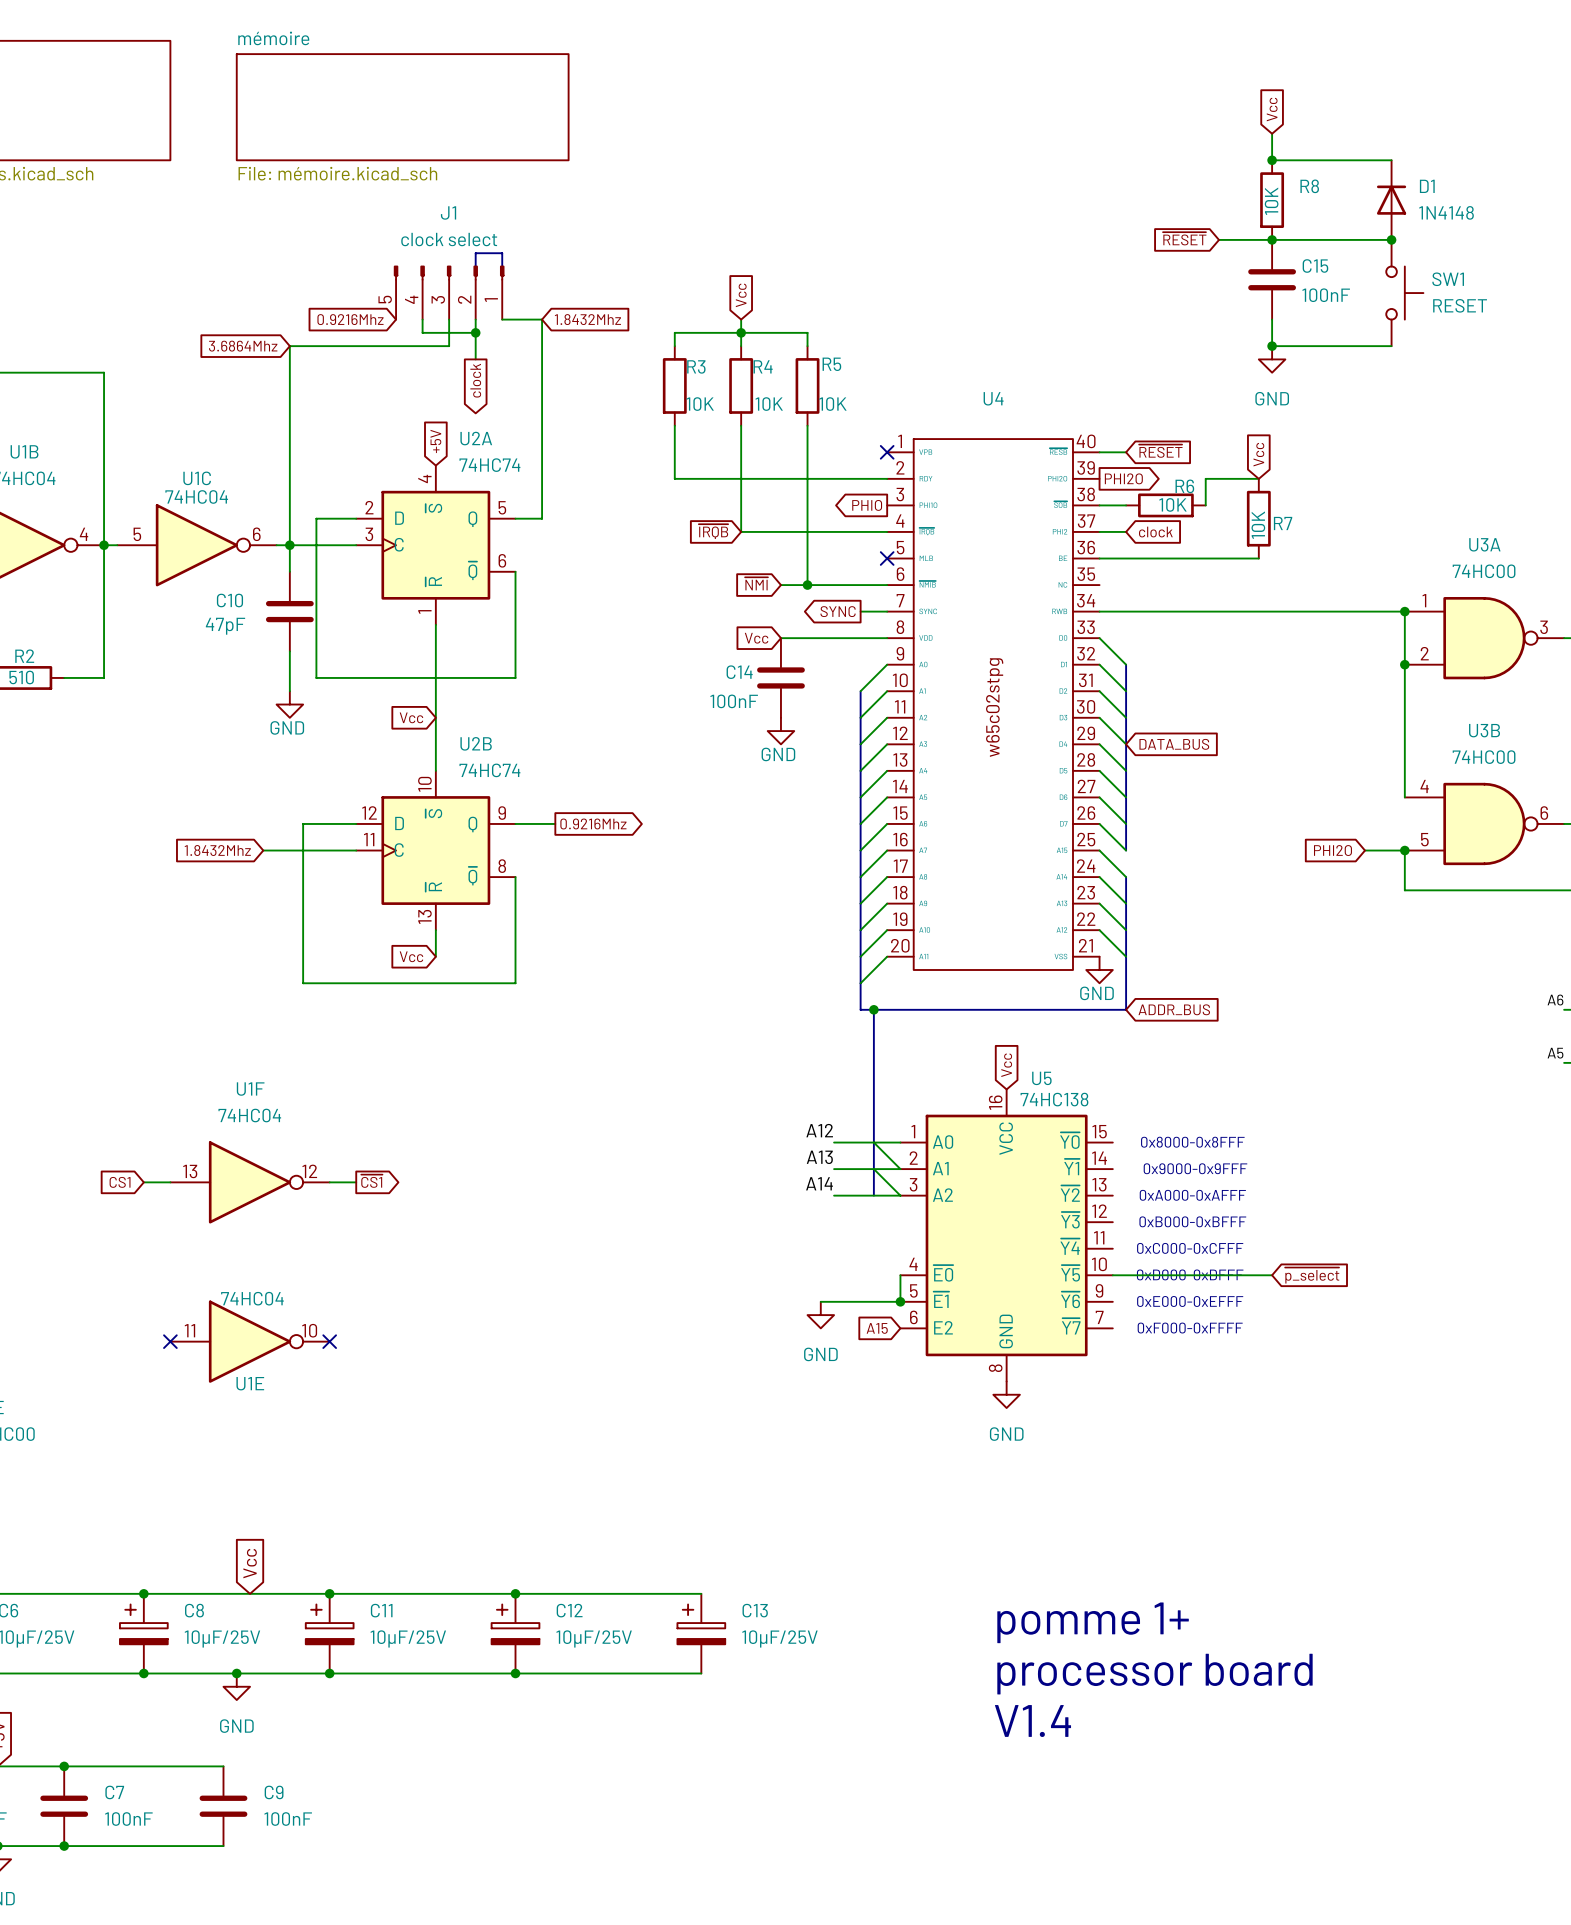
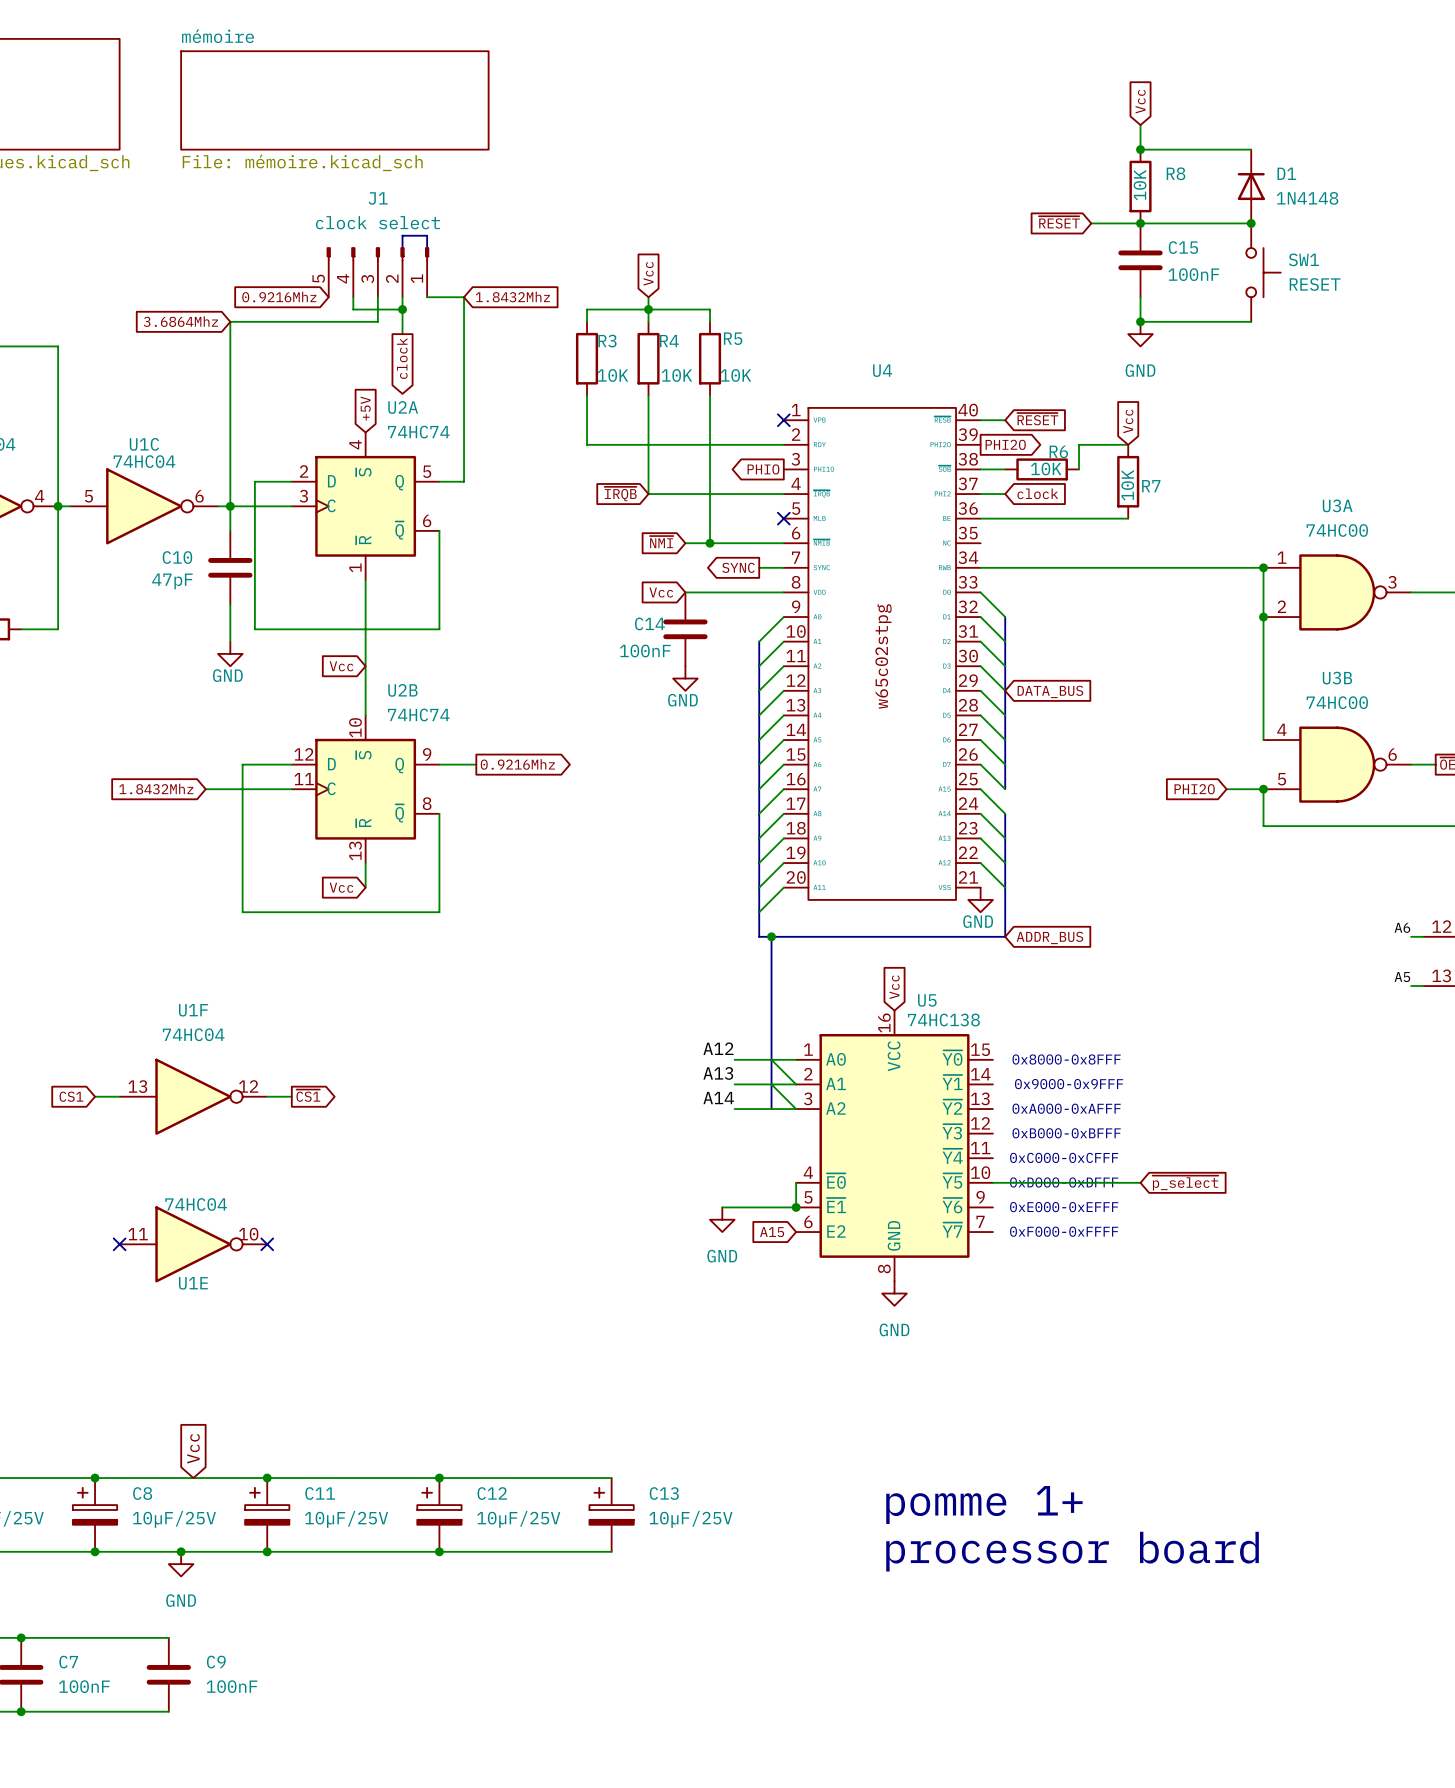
text: V1.4 (1032, 1721) -> none

